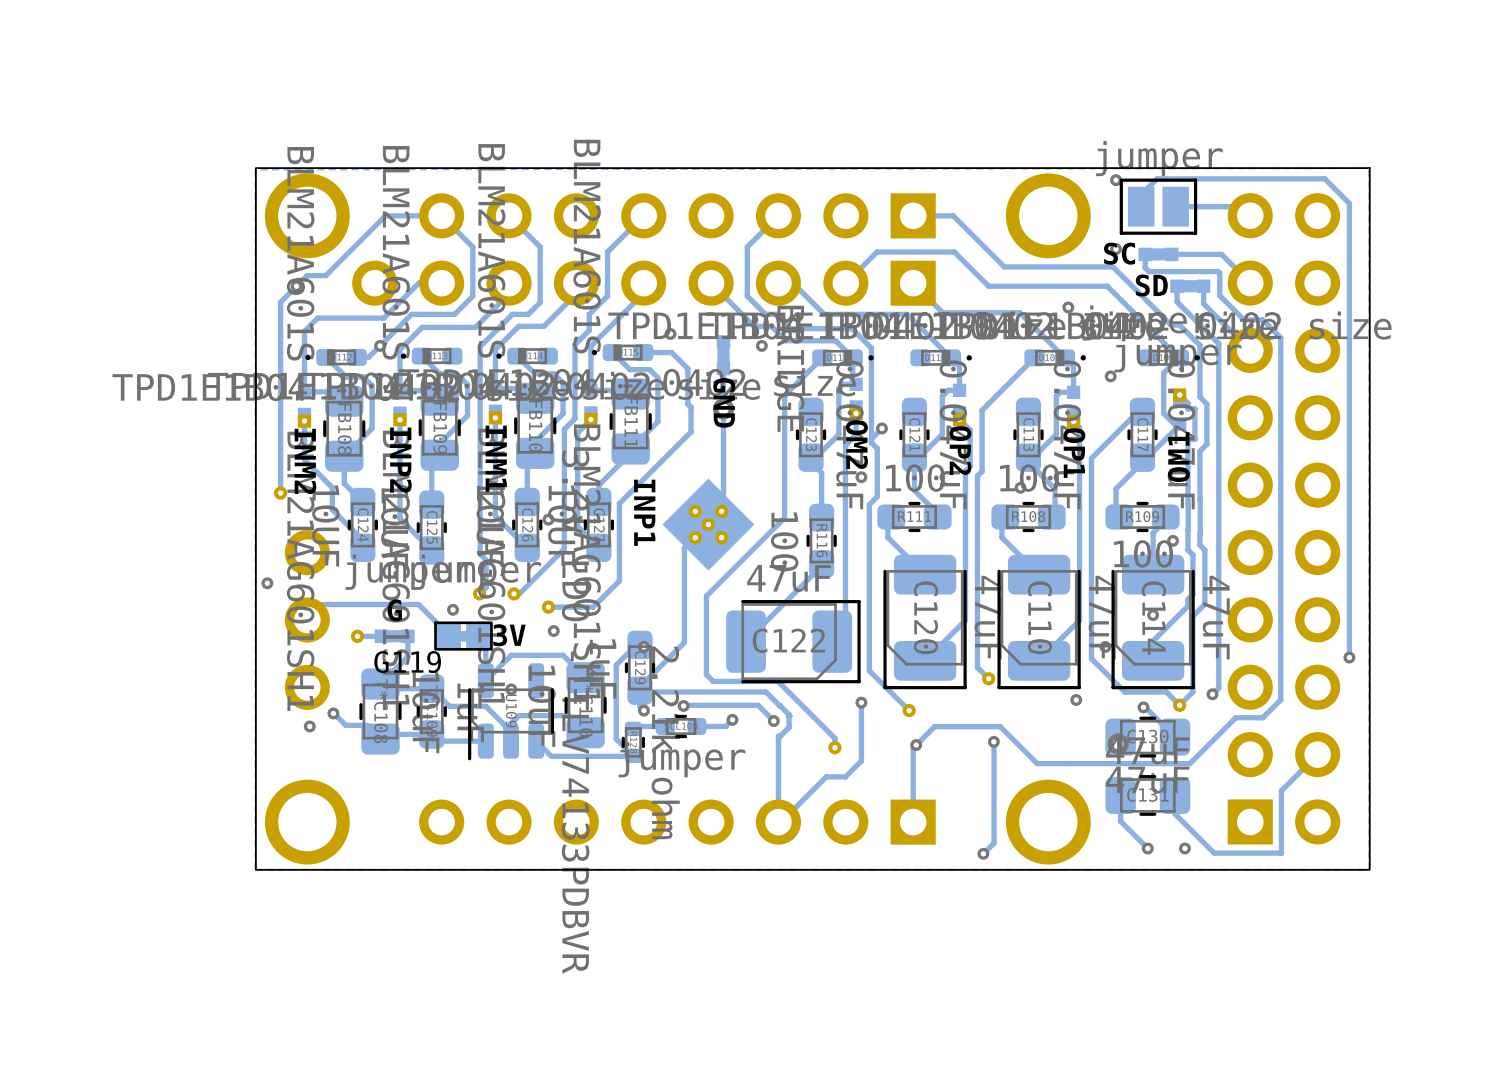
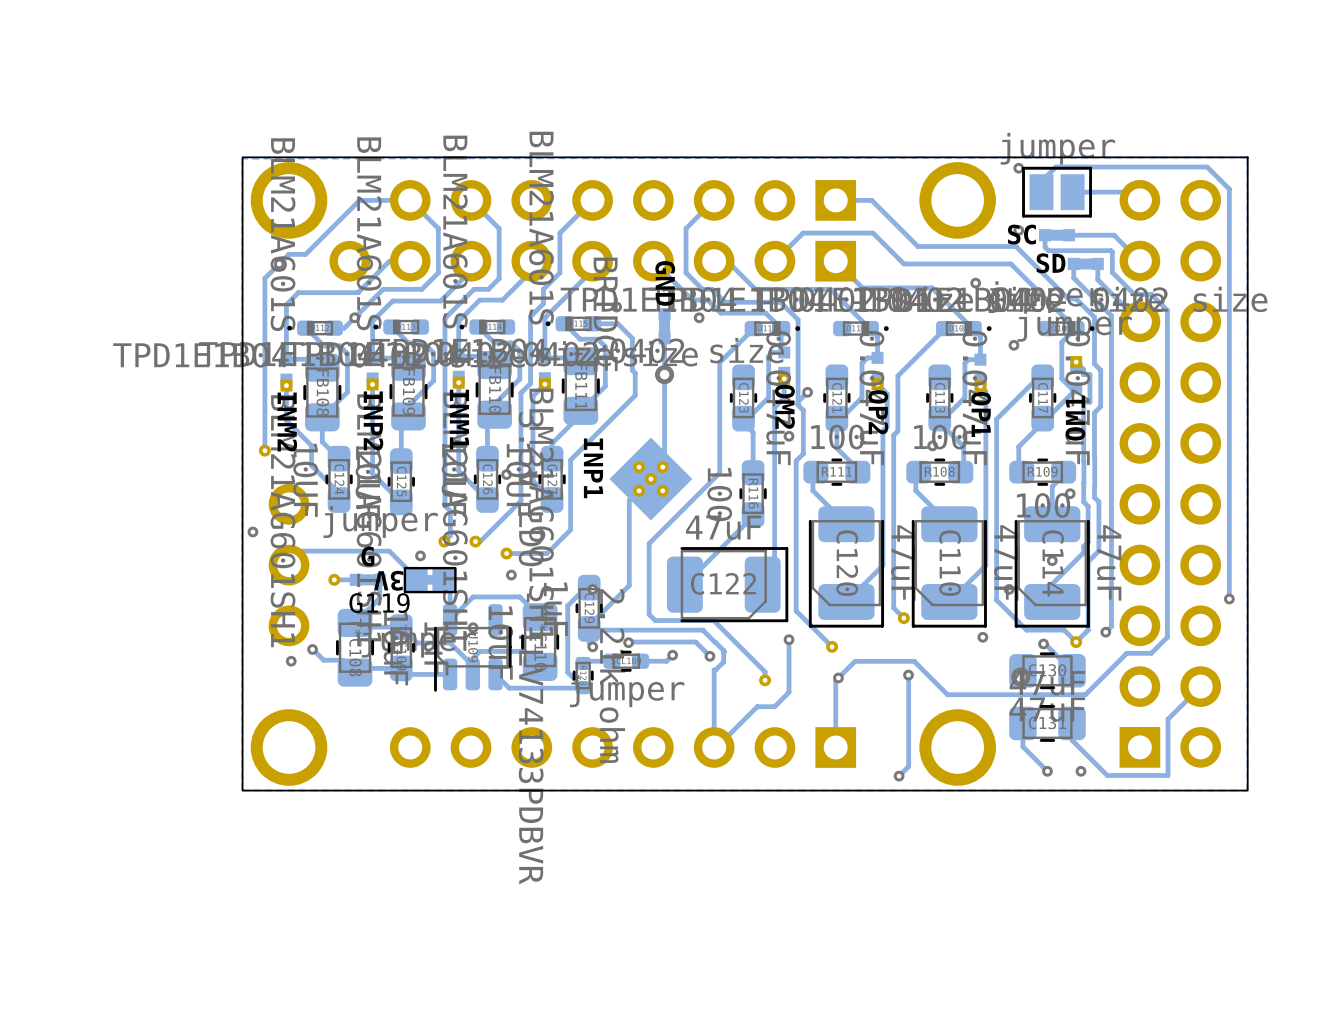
part rotation: 0° (723, 355) -> 180° (664, 326)
part rotation: 0° (463, 636) -> 180° (430, 580)

